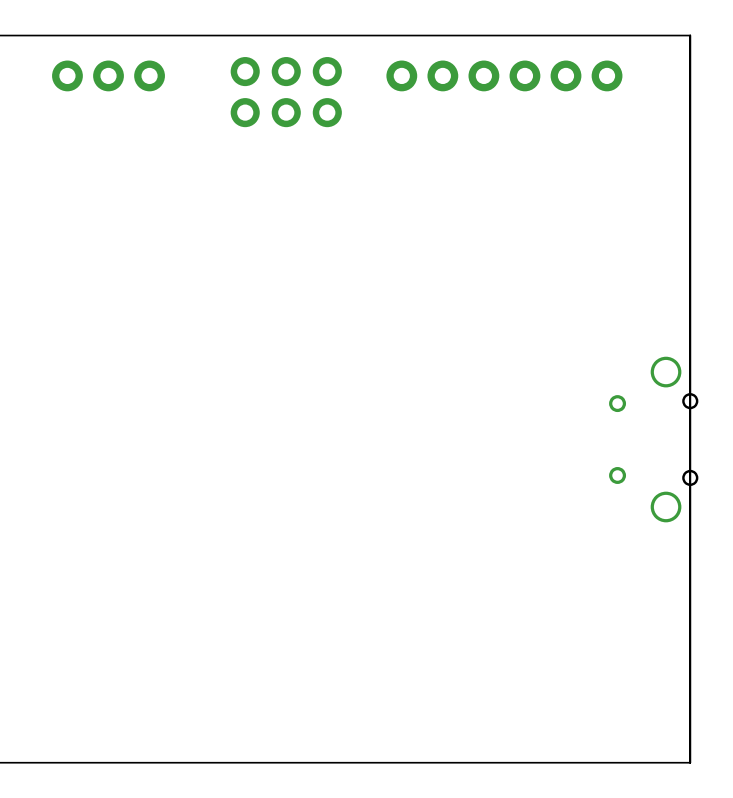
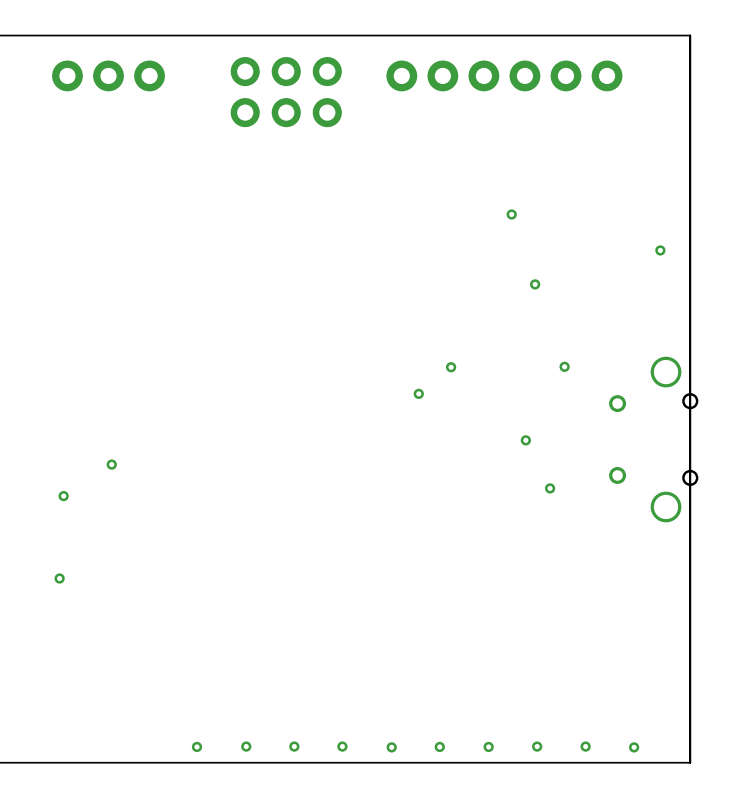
via: none -> (511, 214)
via: none -> (660, 250)
via: none -> (535, 284)
via: none -> (564, 366)
via: none -> (451, 367)
via: none -> (418, 393)
via: none -> (525, 440)
via: none -> (111, 464)
via: none -> (550, 488)
via: none -> (63, 496)
via: none -> (59, 578)
via: none -> (196, 746)
via: none -> (246, 746)
via: none -> (294, 746)
via: none -> (342, 746)
via: none -> (439, 746)
via: none -> (488, 746)
via: none -> (537, 746)
via: none -> (585, 746)
via: none -> (391, 747)
via: none -> (634, 747)

